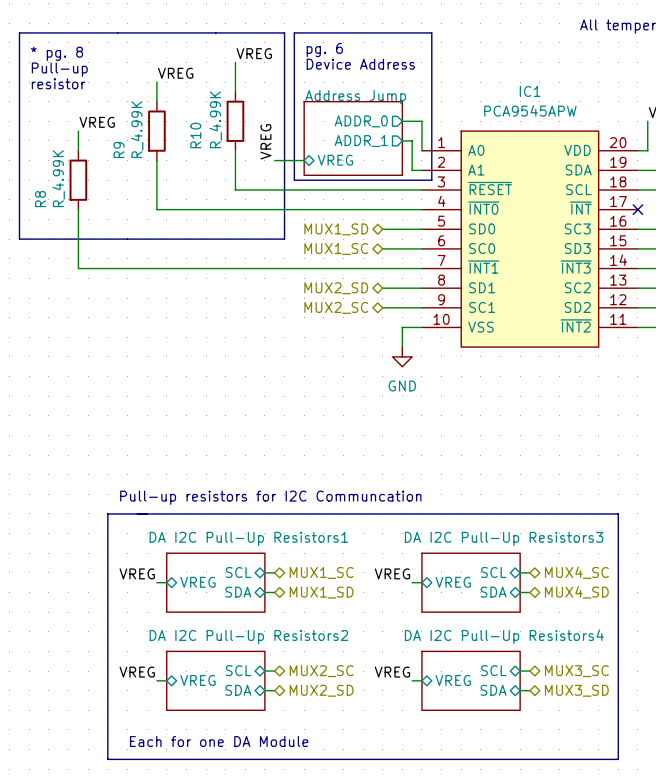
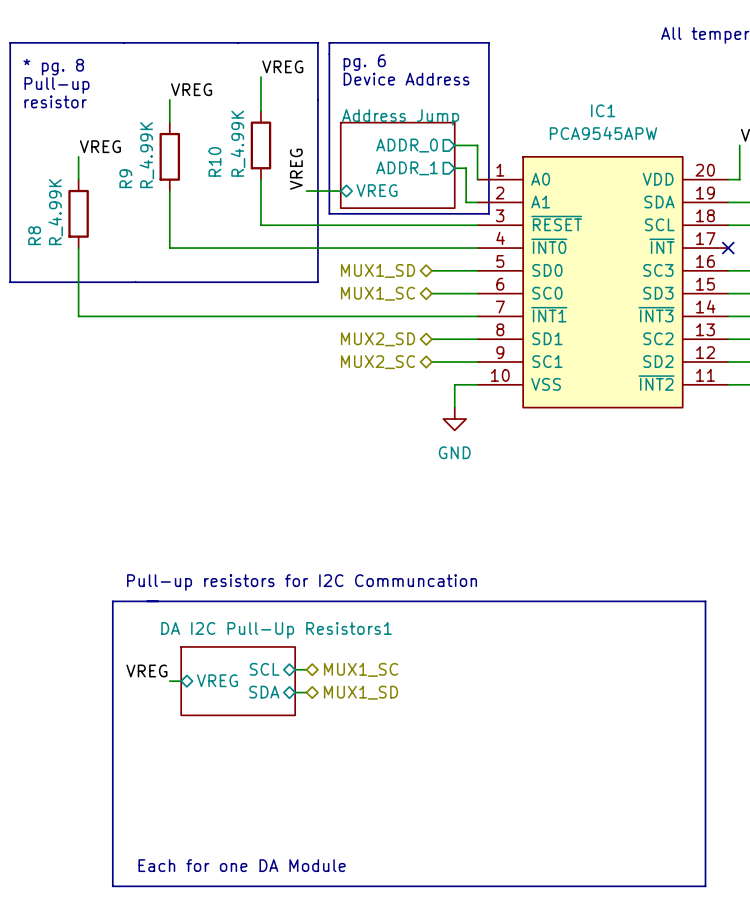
sheet pin: SCL (493, 572) -> none
wire: (520, 572) (529, 572) -> none
hierarchical label: MUX4_SC (576, 572) -> none
label: VREG (392, 573) -> none
wire: (412, 582) (421, 582) -> none
sheet pin: VREG (453, 582) -> none
sheet DA I2C Pull-Up Resistors3: (471, 582) -> none
sheet pin: SDA (493, 592) -> none
wire: (520, 592) (529, 592) -> none
hierarchical label: MUX4_SD (576, 592) -> none
sheet pin: SCL (238, 670) -> none
sheet pin: SCL (493, 670) -> none
wire: (264, 671) (274, 671) -> none
hierarchical label: MUX2_SC (321, 671) -> none
wire: (520, 671) (529, 671) -> none
hierarchical label: MUX3_SC (576, 671) -> none
label: VREG (137, 672) -> none
label: VREG (392, 672) -> none
wire: (156, 680) (166, 680) -> none
sheet pin: VREG (197, 680) -> none
sheet DA I2C Pull-Up Resistors2: (215, 680) -> none
wire: (412, 680) (421, 680) -> none
sheet pin: VREG (453, 680) -> none
sheet DA I2C Pull-Up Resistors4: (471, 680) -> none
sheet pin: SDA (238, 690) -> none
wire: (264, 690) (274, 690) -> none
hierarchical label: MUX2_SD (321, 690) -> none
sheet pin: SDA (493, 690) -> none
wire: (520, 690) (529, 690) -> none
hierarchical label: MUX3_SD (576, 690) -> none

